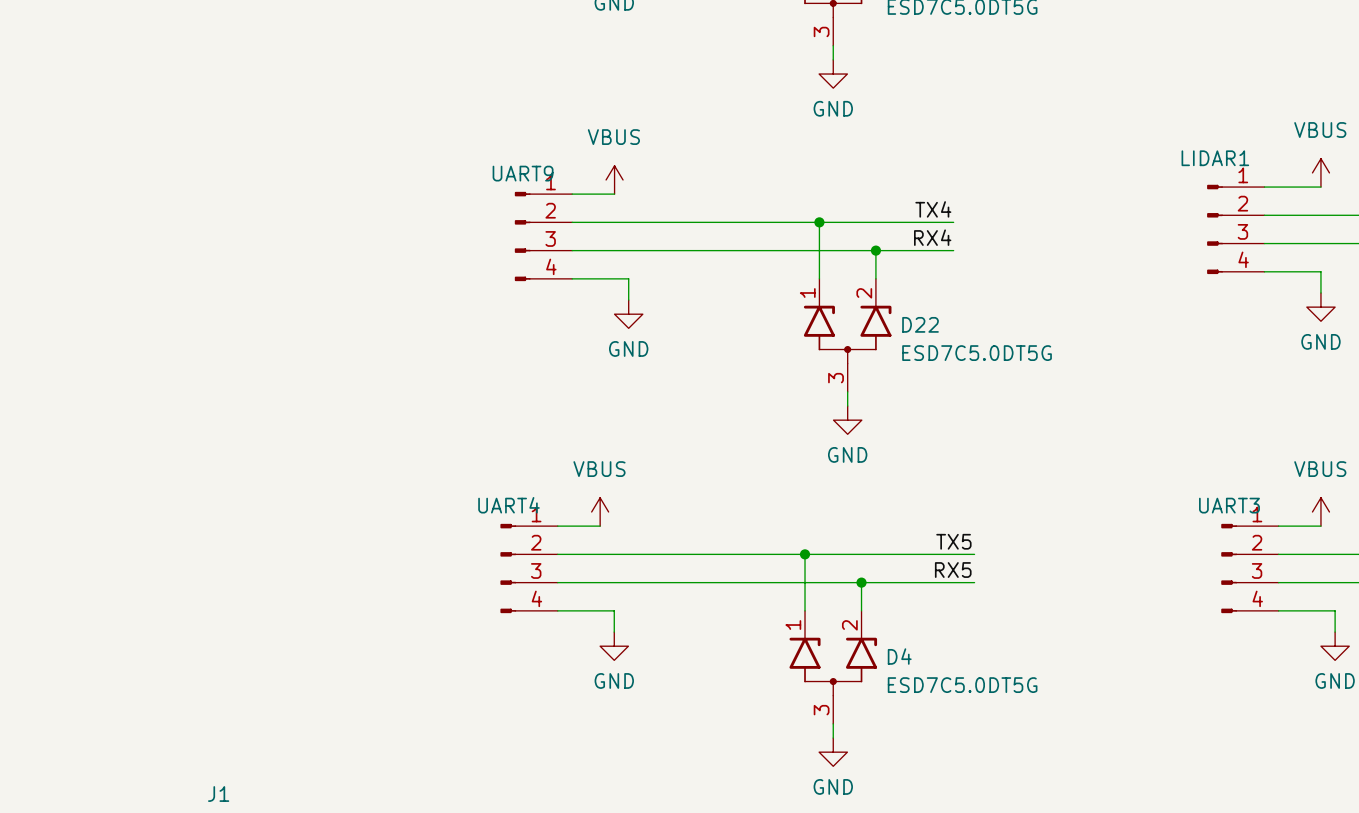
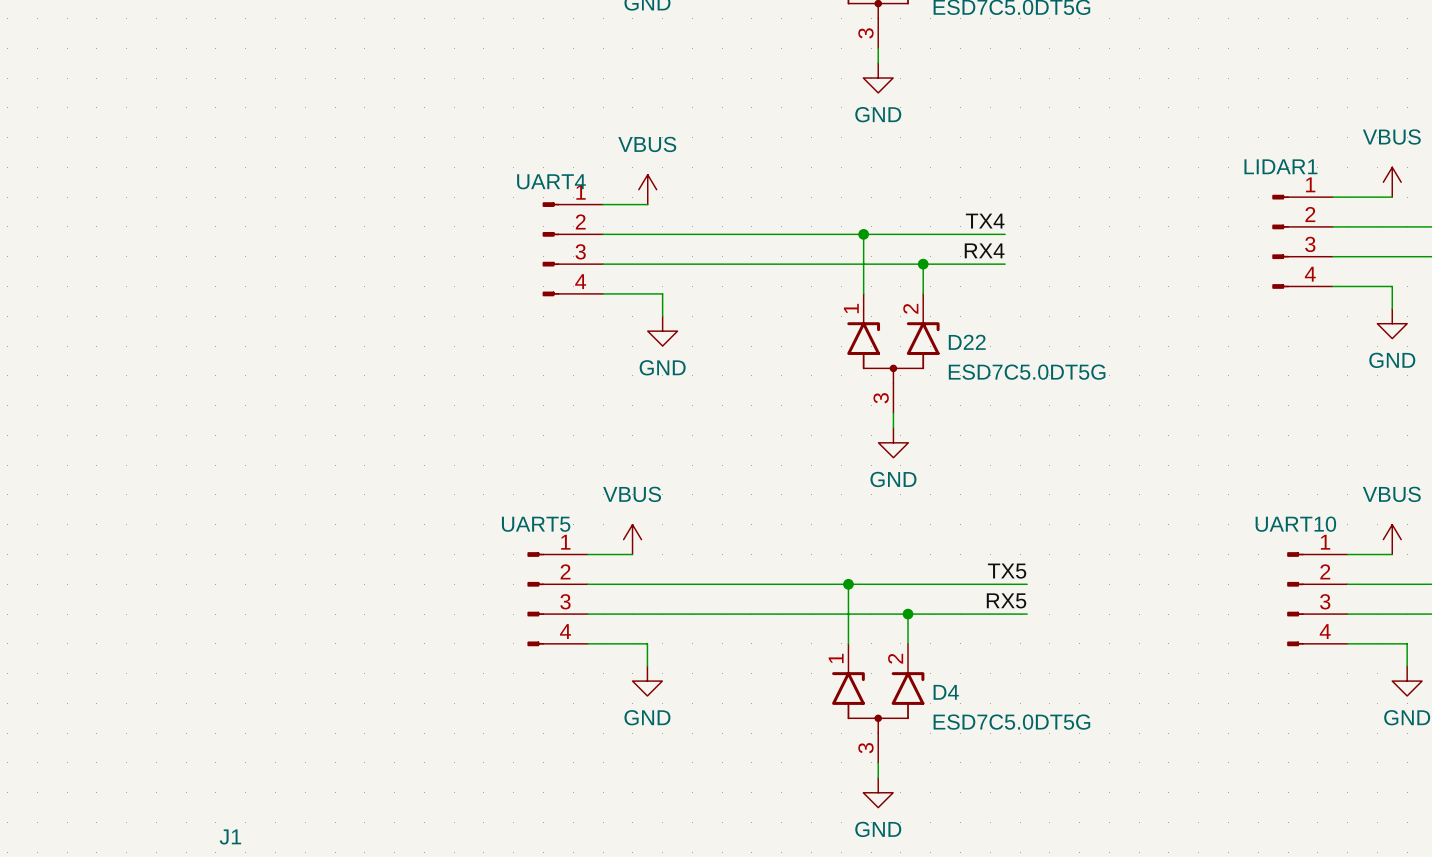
UART9 name: UART9 (523, 173) -> UART4 (551, 181)
UART4 name: UART4 (508, 505) -> UART5 (536, 524)
UART3 name: UART3 (1229, 505) -> UART10 (1295, 524)

